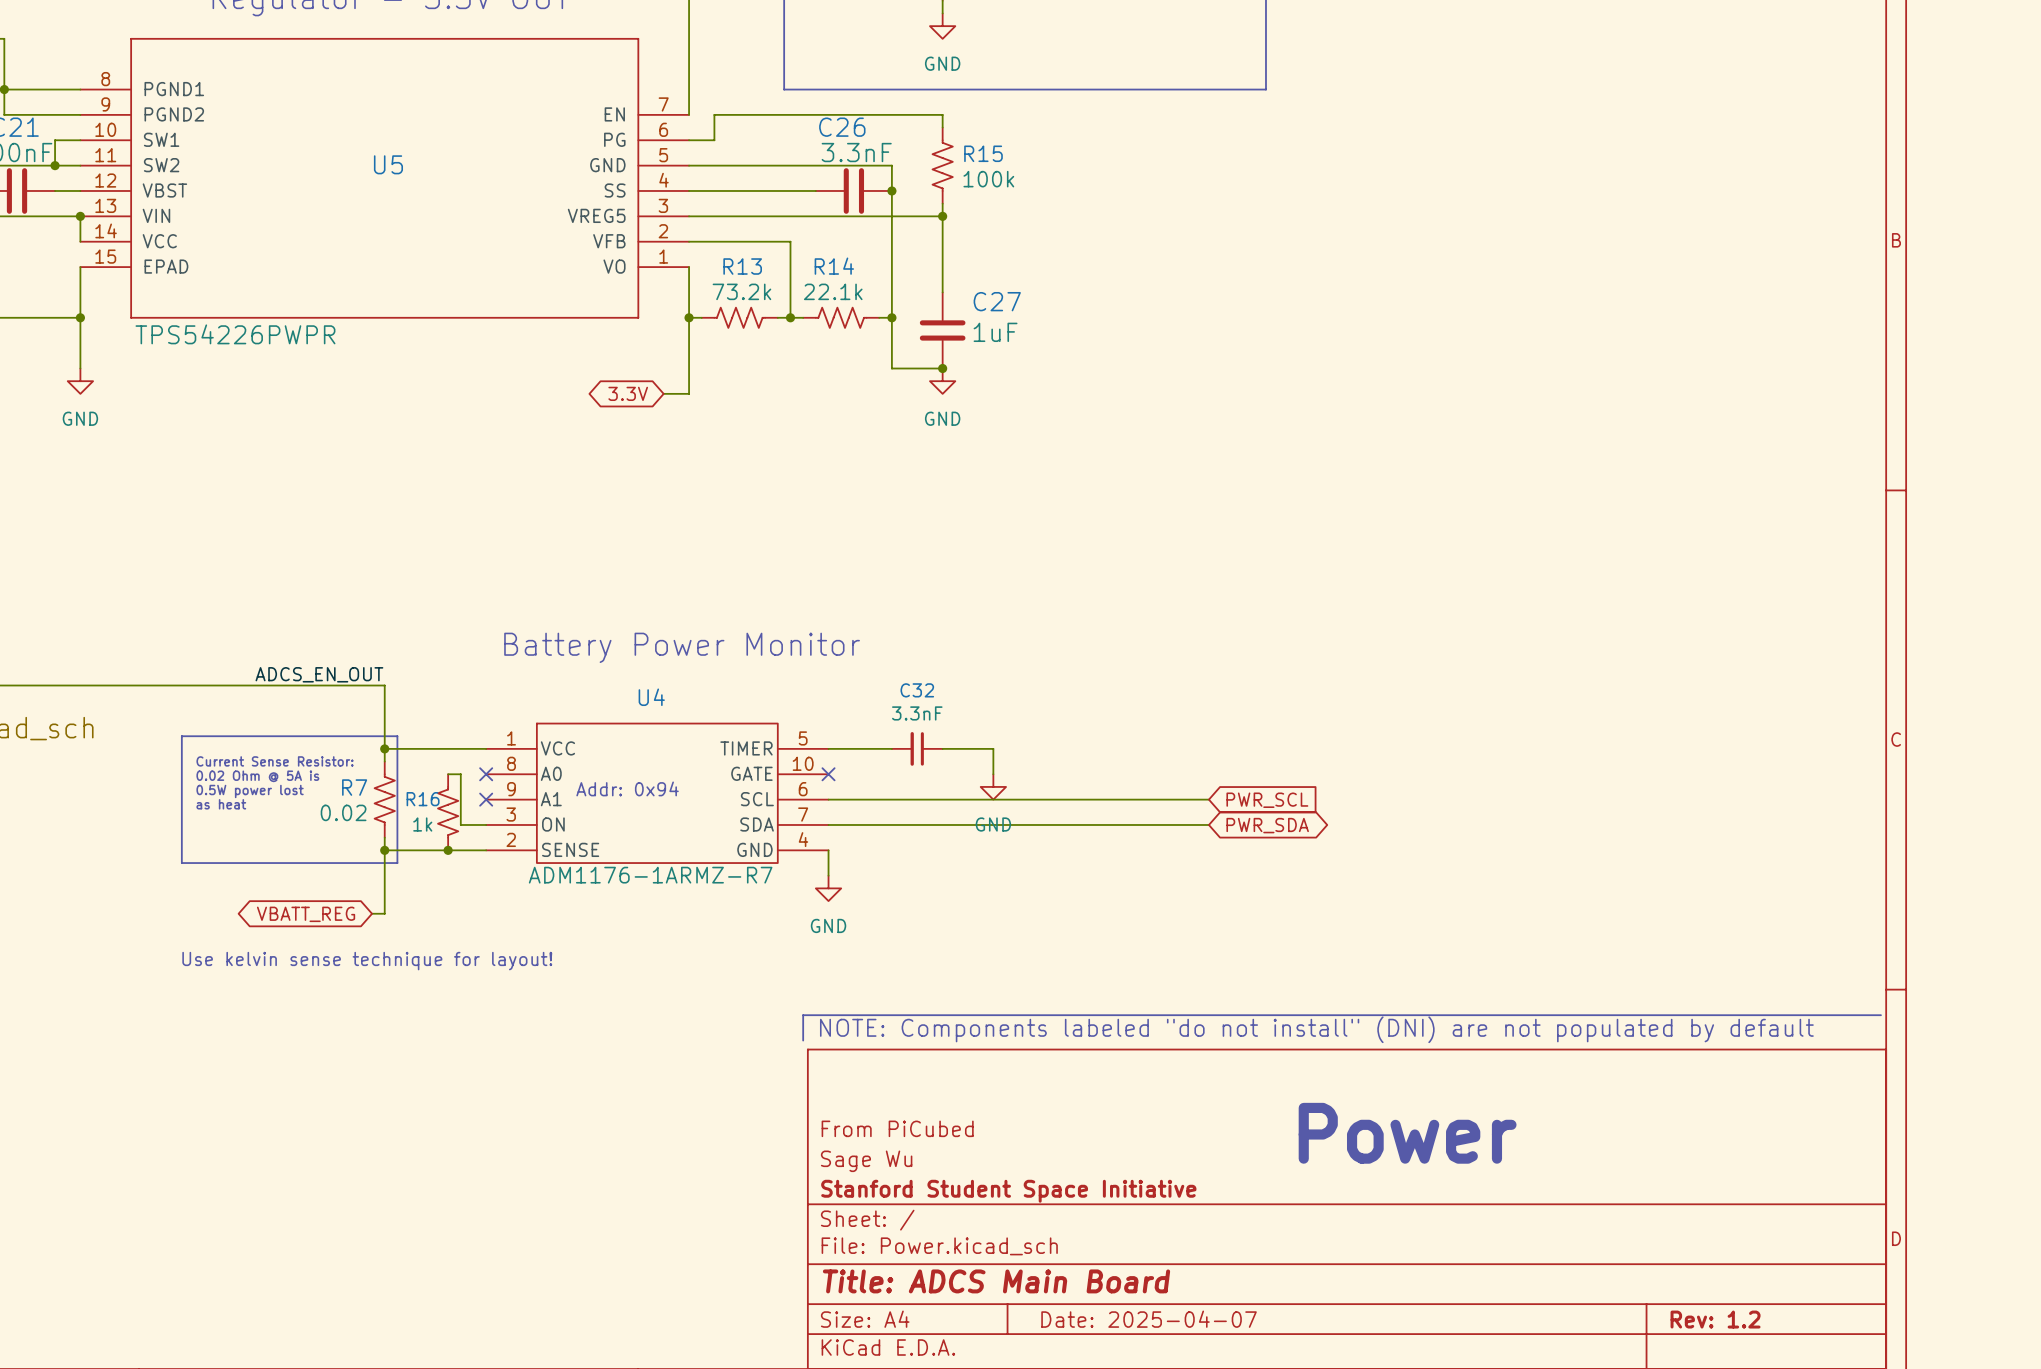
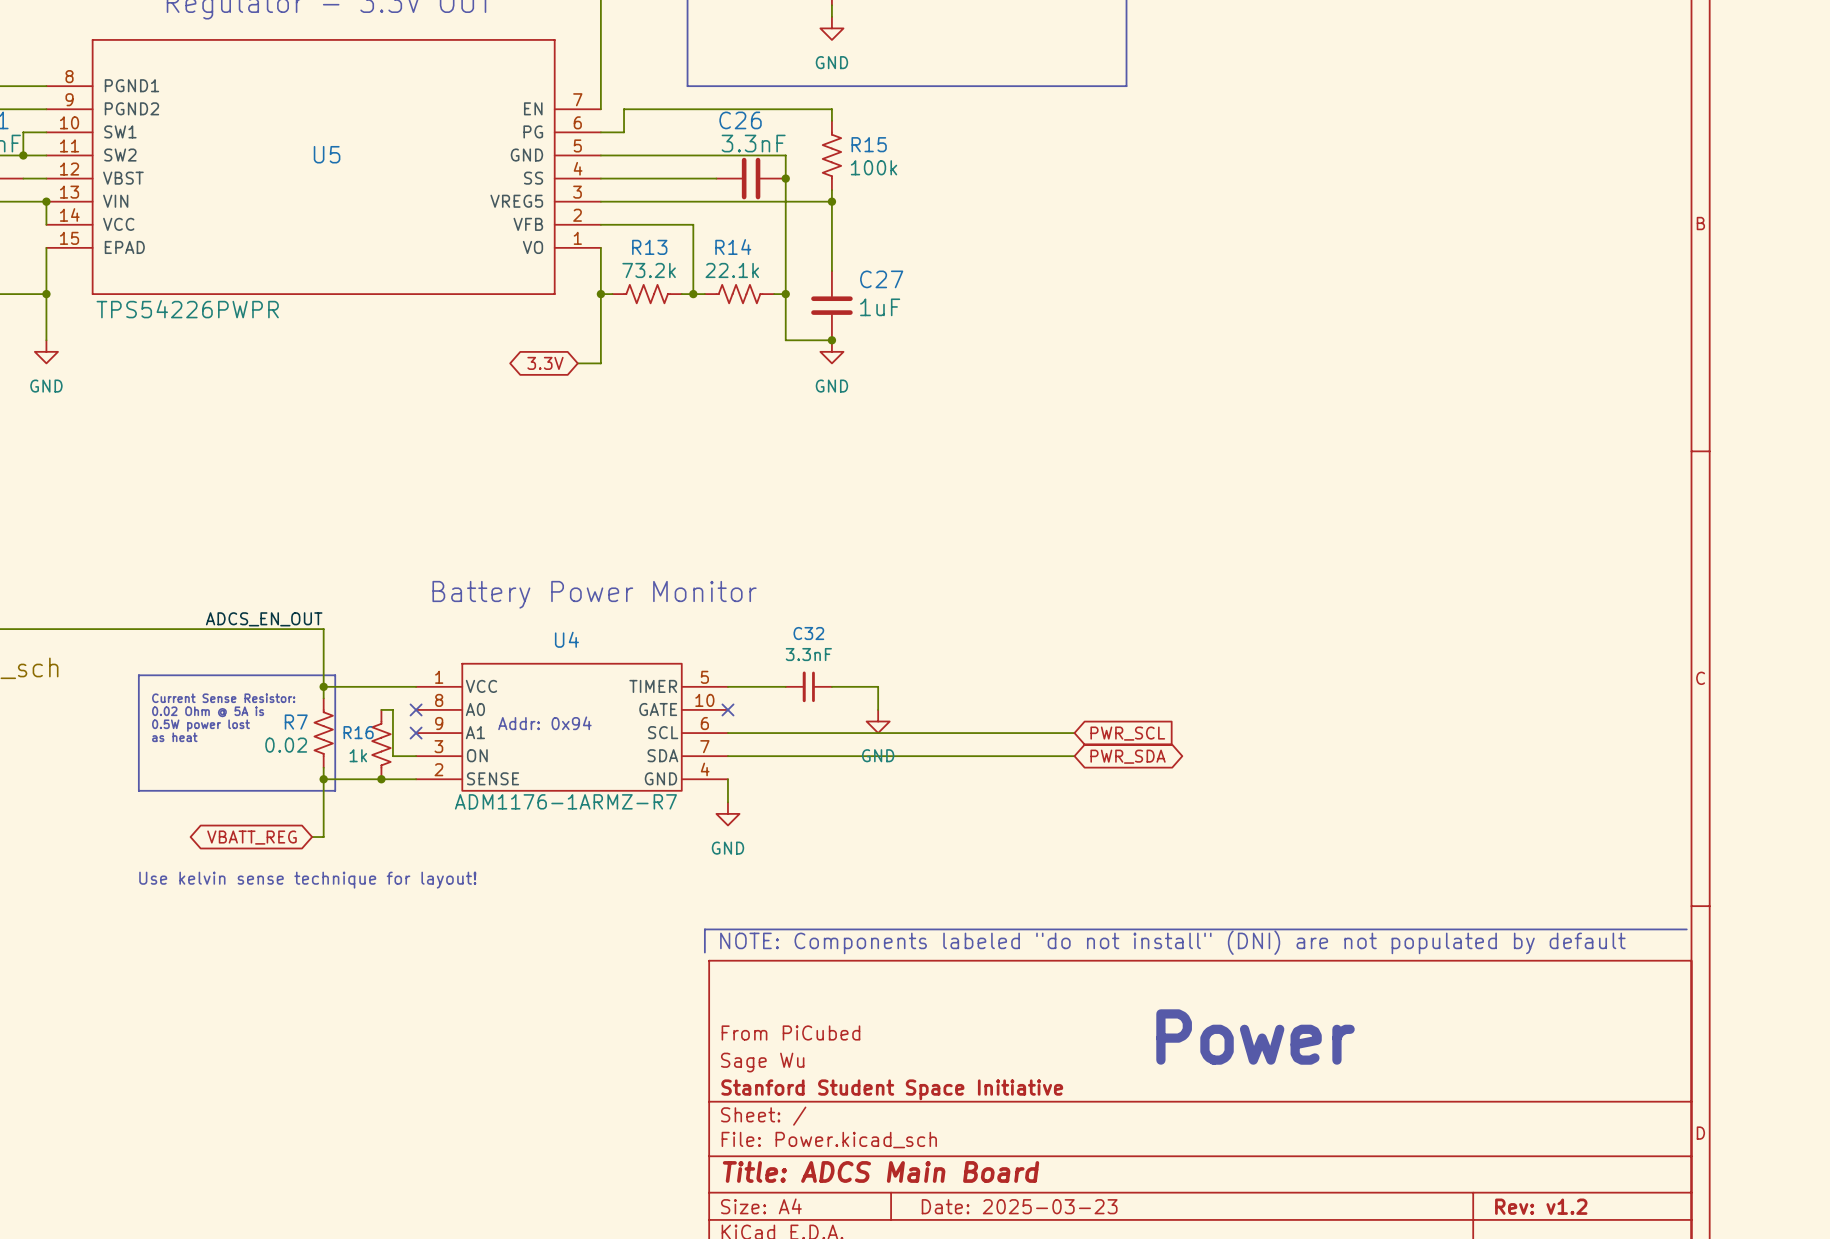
title block: Date: 2025-04-07 (1149, 1319) -> Date: 2025-03-23 (1019, 1206)
title block: Rev: 1.2 (1715, 1319) -> Rev: v1.2 (1541, 1206)

